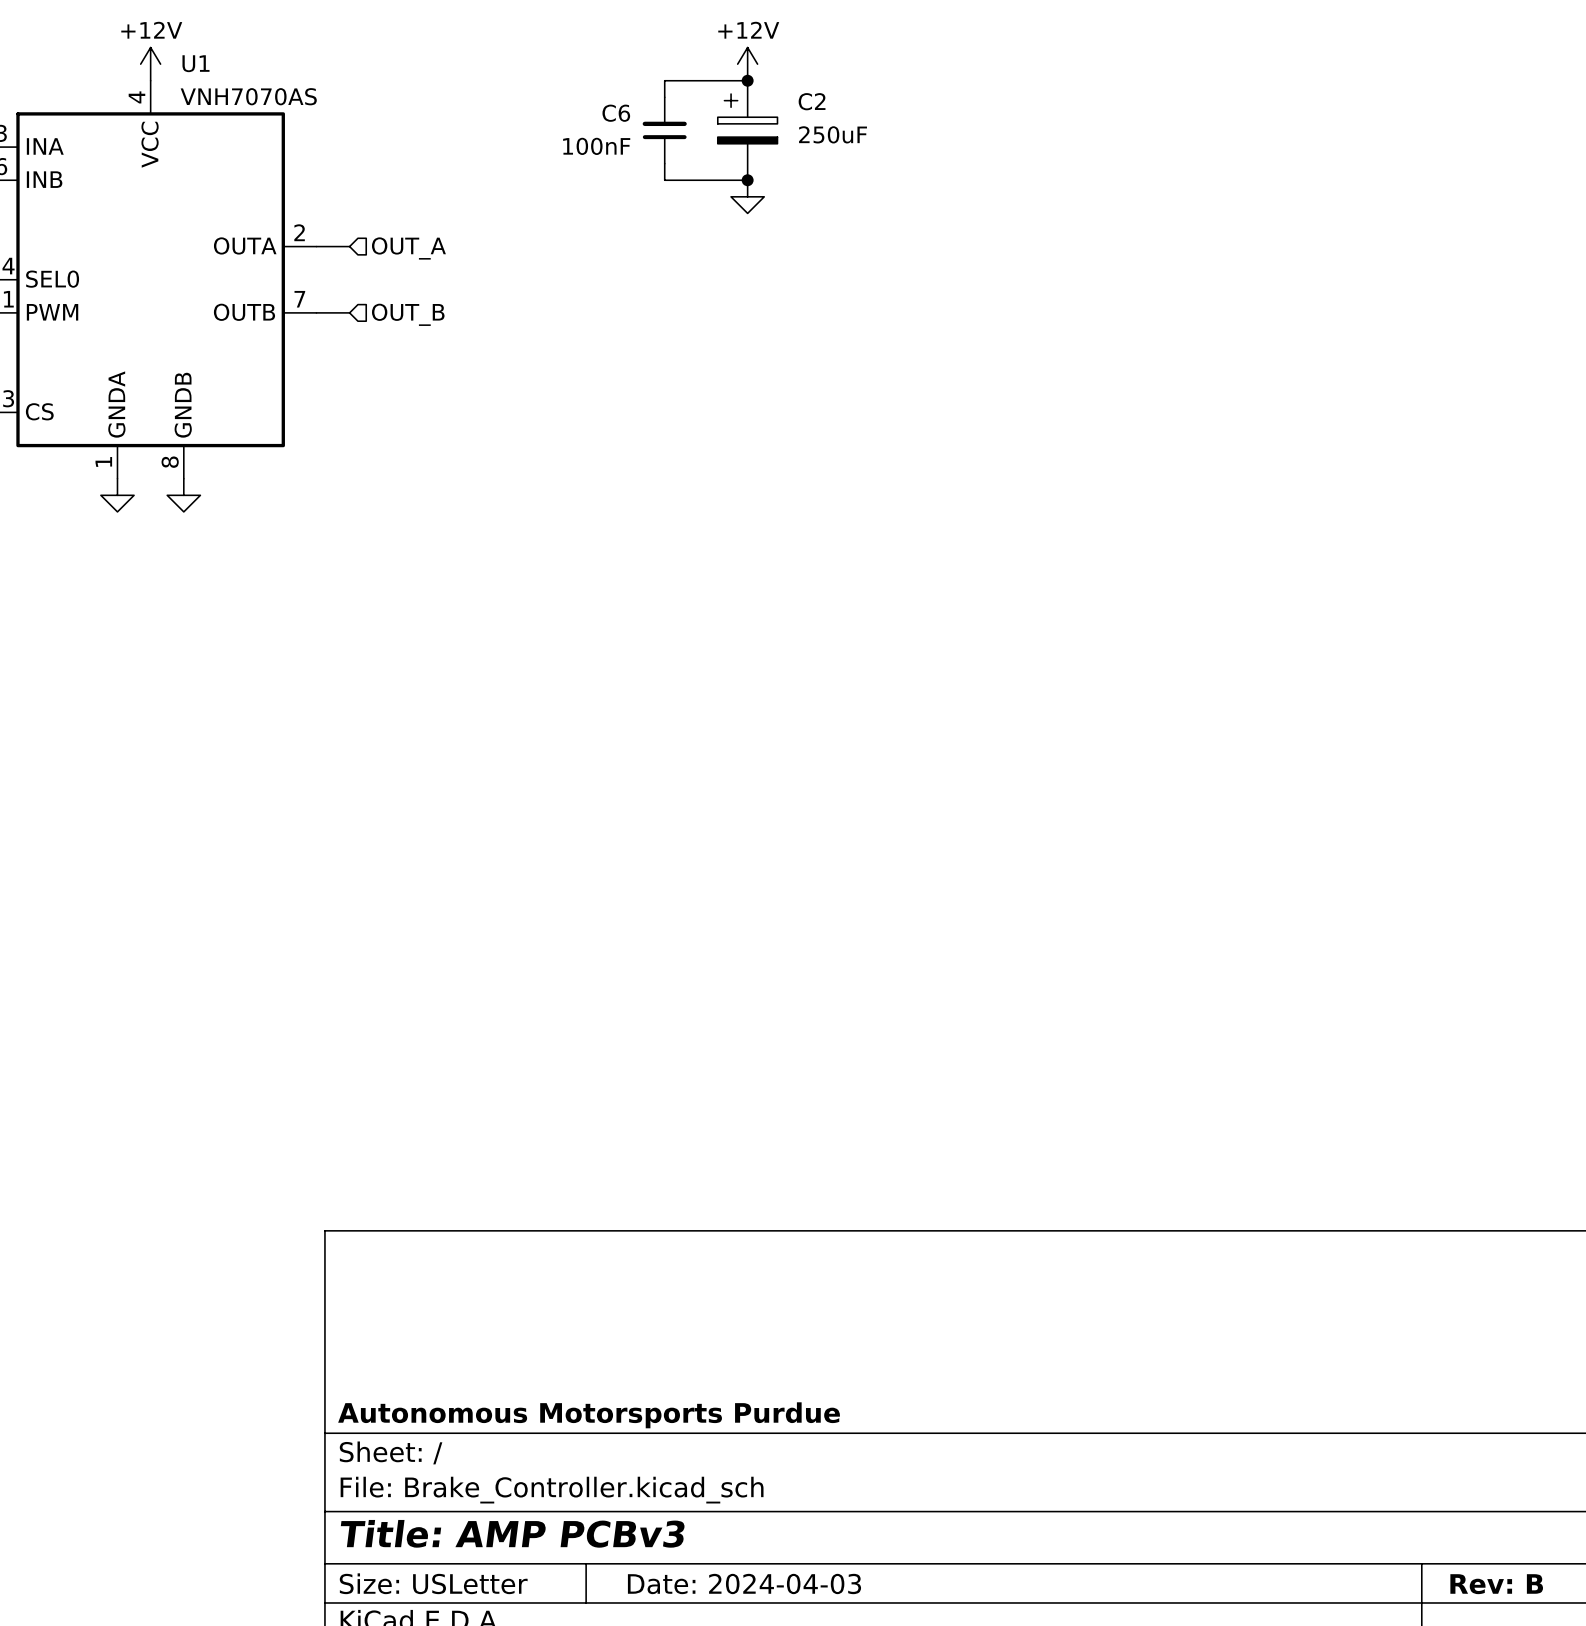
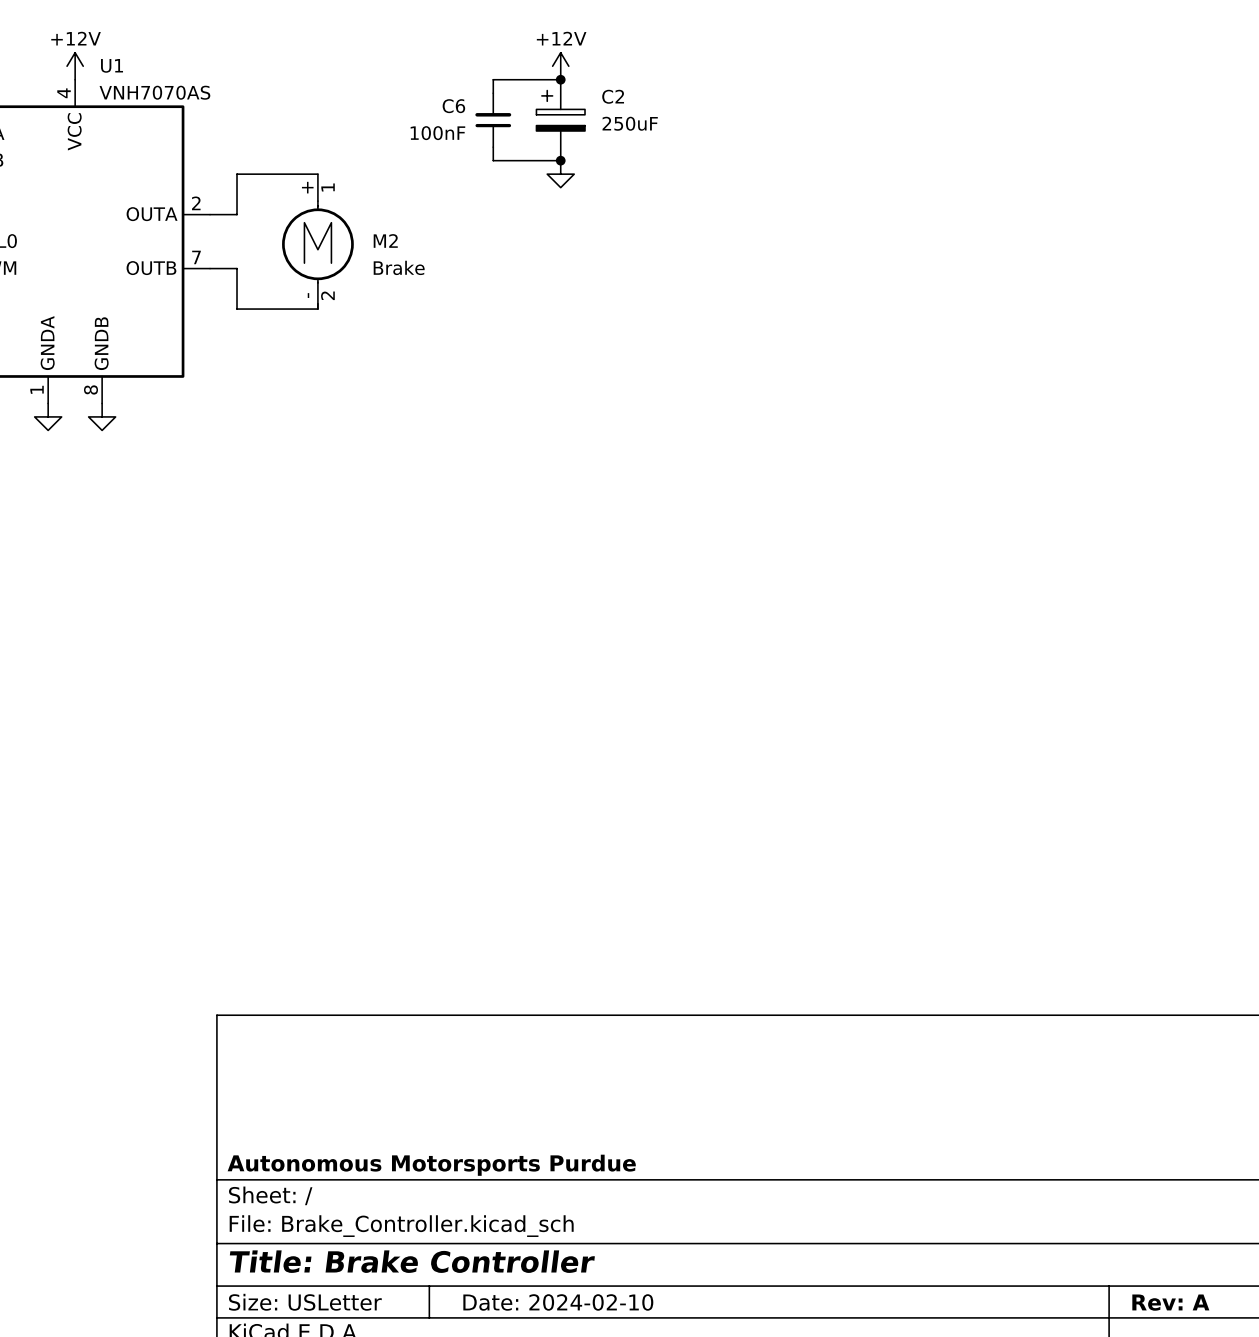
wire: none -> (317, 174) (237, 174) (237, 214)
hierarchical label: OUT_A (408, 248) -> none
M2: none -> Brake (317, 241)
wire: none -> (237, 268) (237, 309) (317, 309)
hierarchical label: OUT_B (408, 314) -> none
title block: Title: AMP PCBv3 (512, 1533) -> Title: Brake Controller (412, 1261)
title block: Date: 2024-04-03 (744, 1583) -> Date: 2024-02-10 (558, 1302)
title block: Rev: B (1496, 1584) -> Rev: A (1170, 1302)

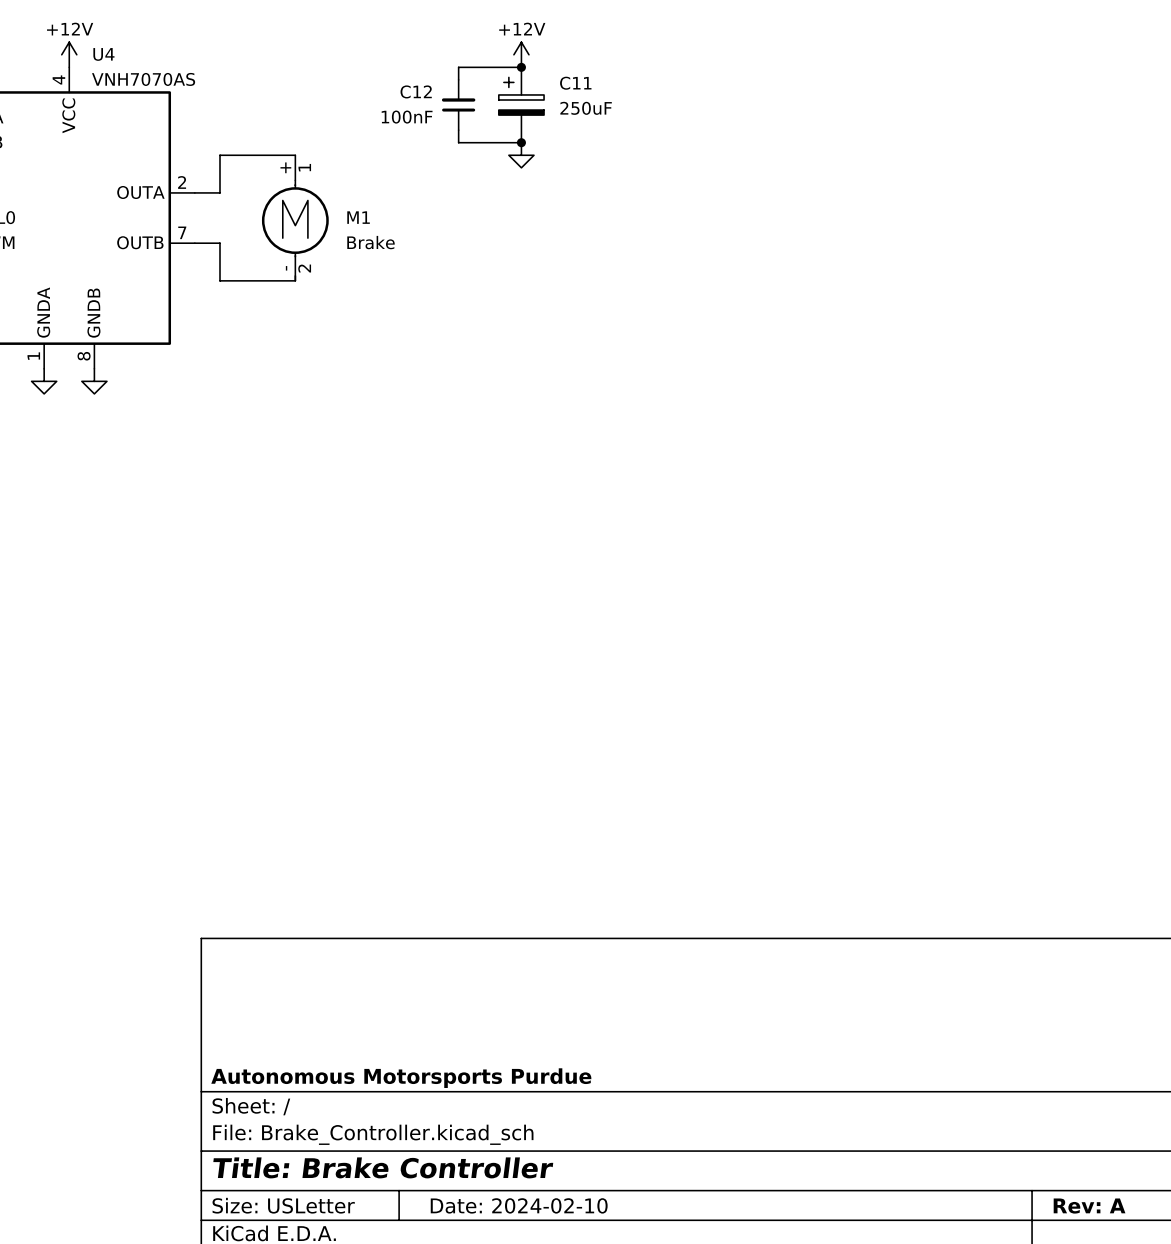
U1 name: U1 (112, 65) -> U4 (103, 54)
C2 name: C2 (613, 96) -> C11 (575, 83)
C6 name: C6 (453, 106) -> C12 (416, 91)
M2 name: M2 (385, 240) -> M1 (358, 217)

